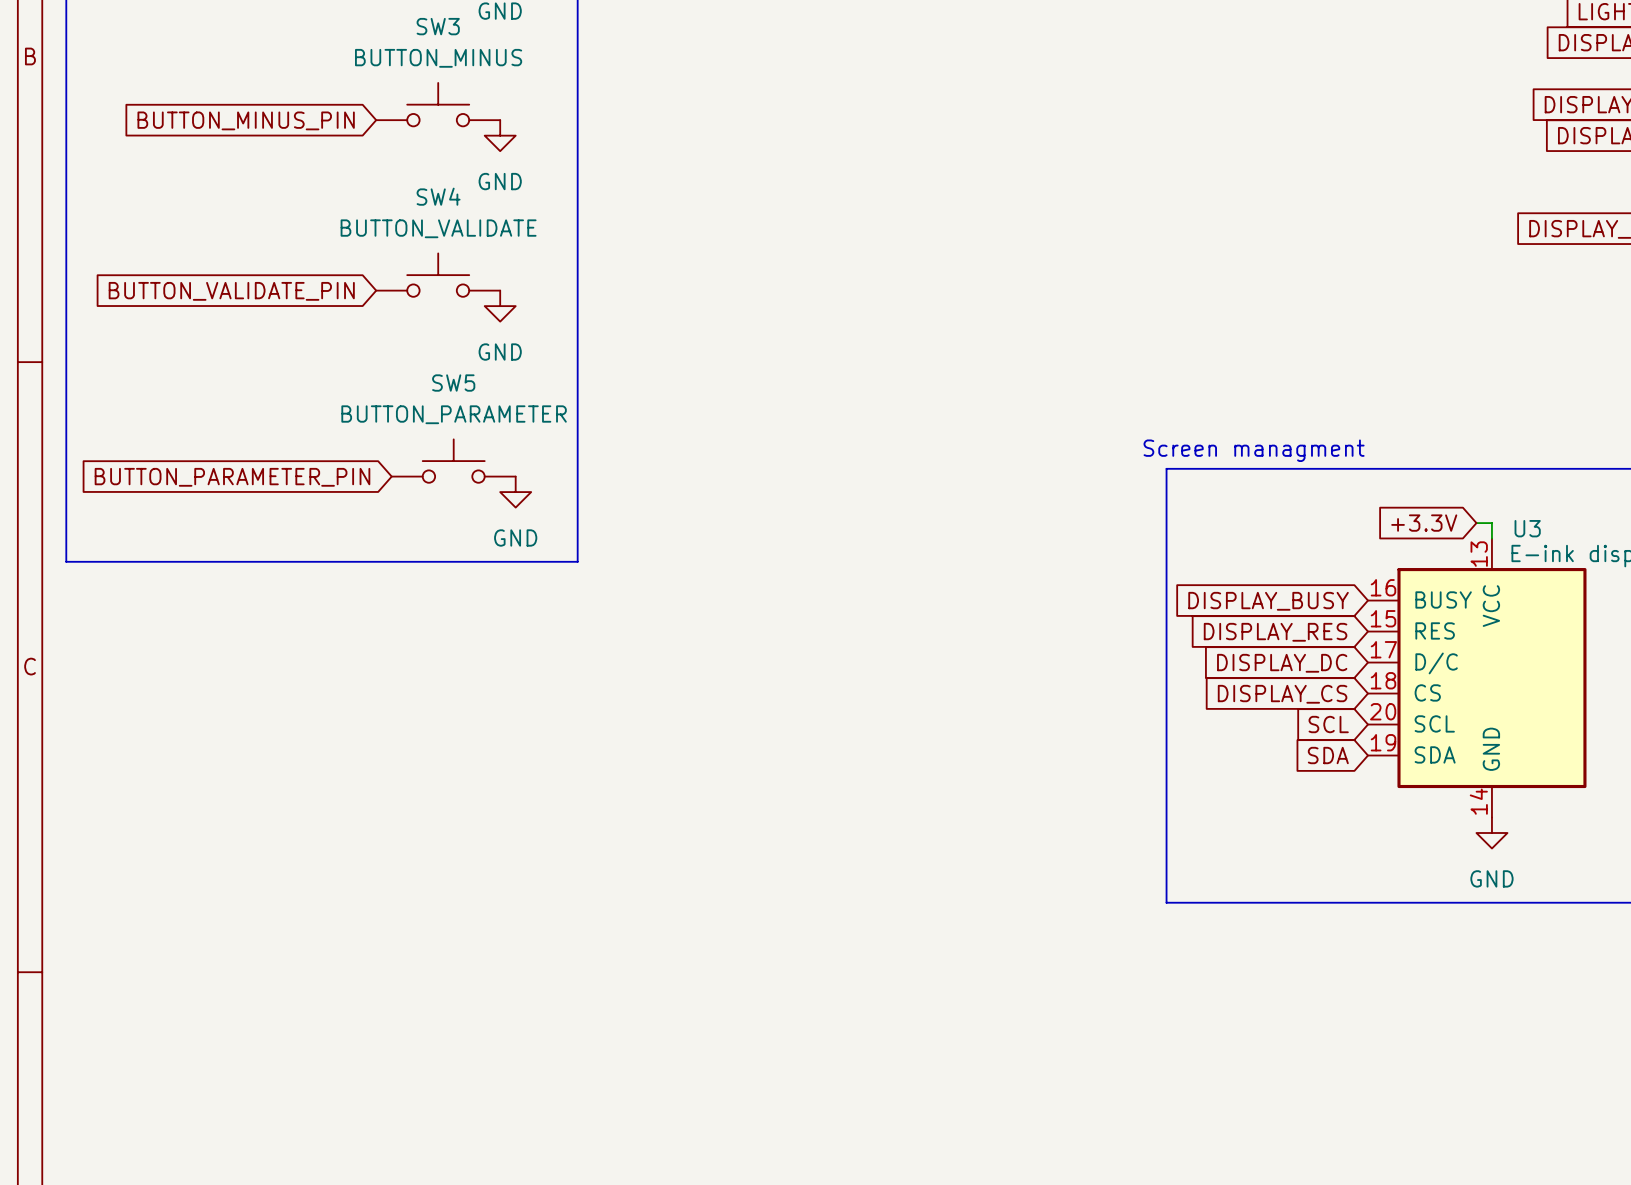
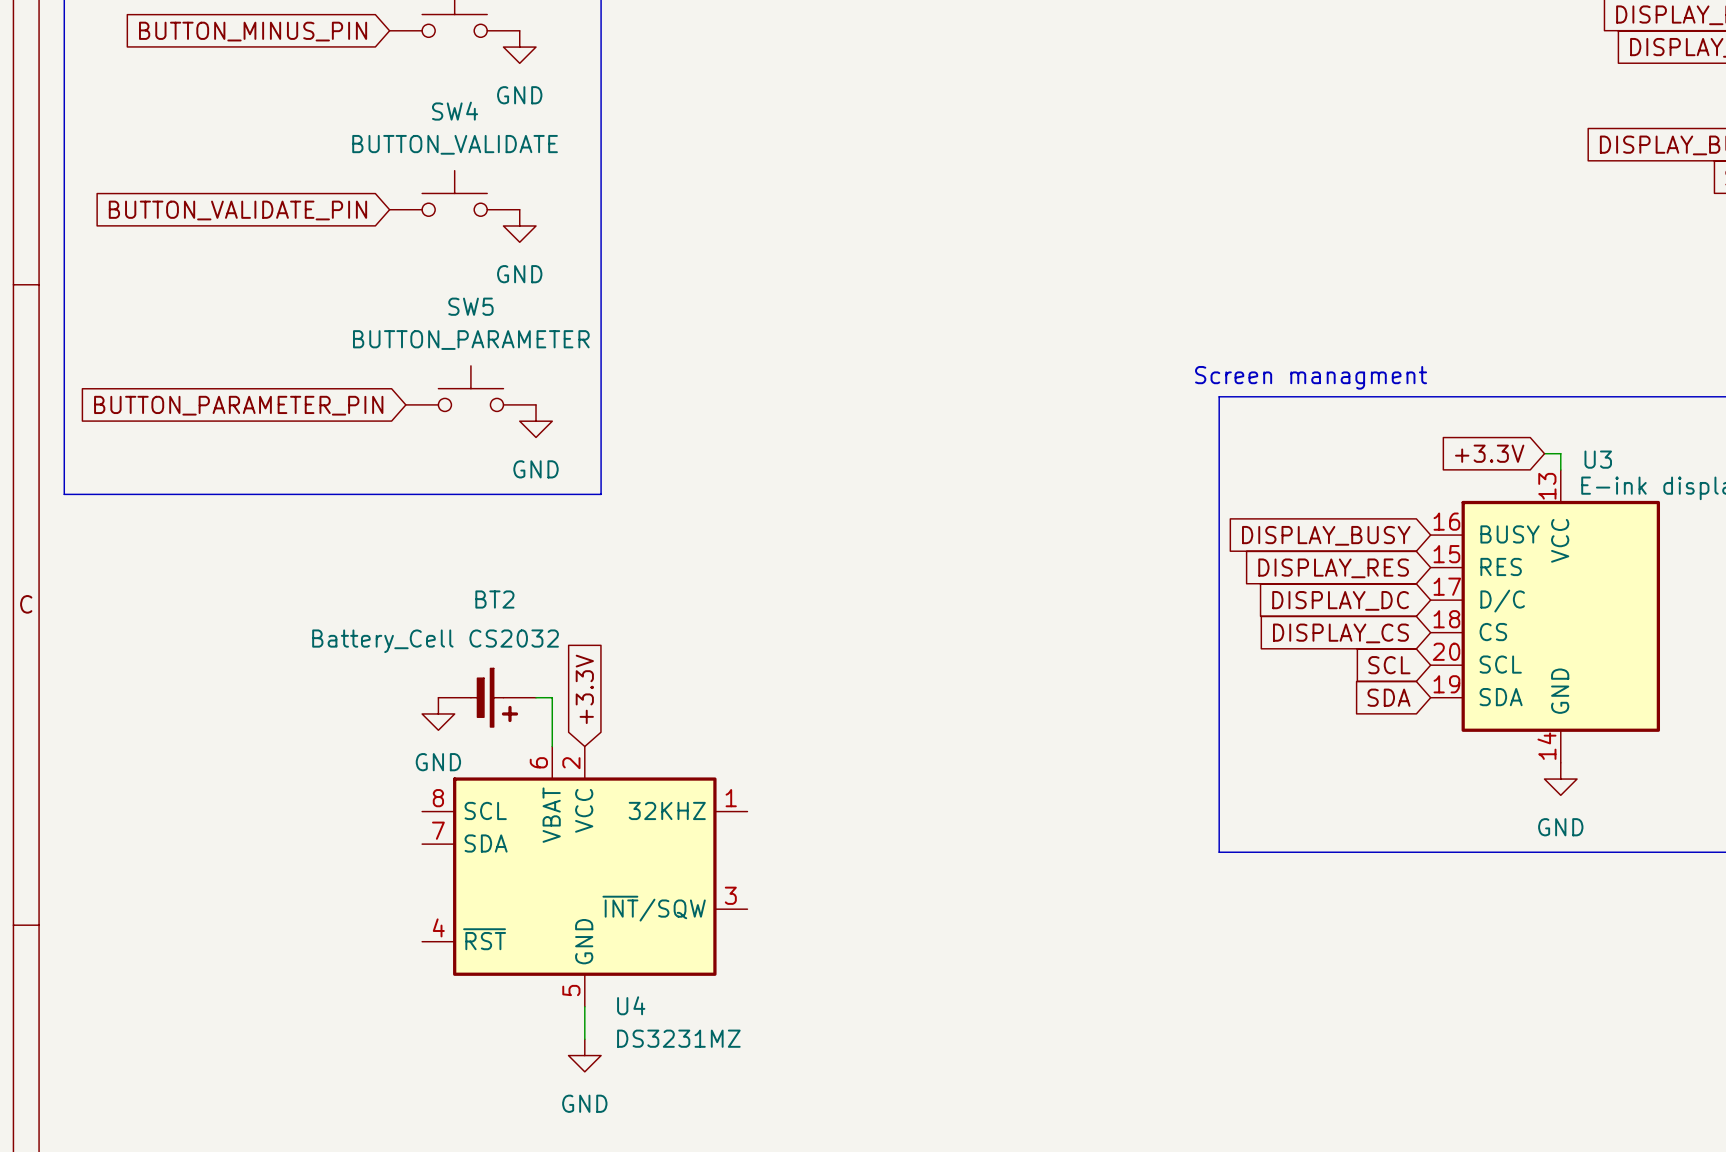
global label: none -> +3.3V (584, 689)
BT2: none -> Battery_Cell CS2032 (487, 697)
wire: none -> (536, 697) (552, 697) (552, 746)
power symbol: none -> GND (438, 713)
U4: none -> DS3231MZ (584, 876)
wire: none -> (584, 1006) (584, 1039)
power symbol: none -> GND (584, 1055)

